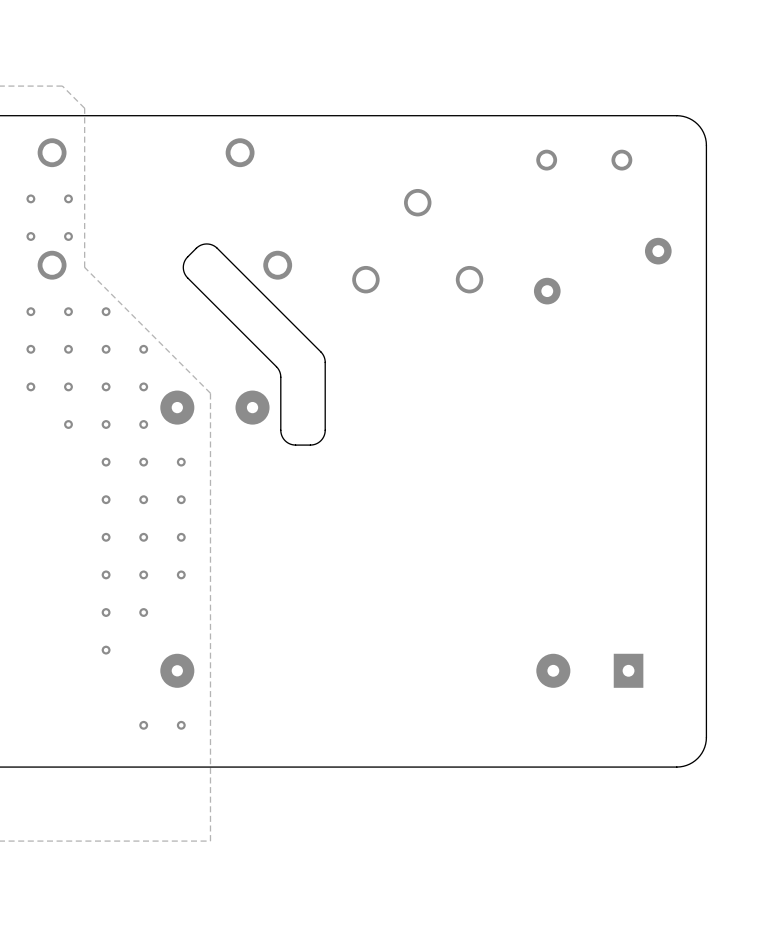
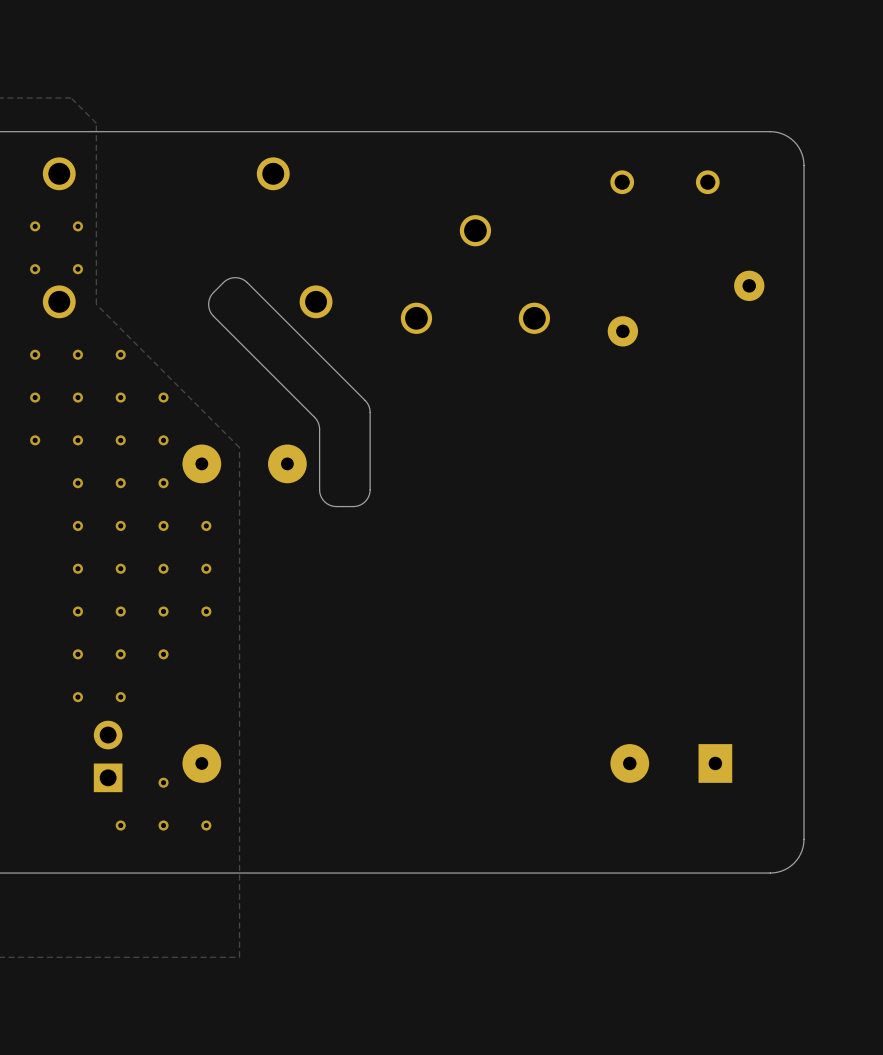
via: none -> (77, 525)
via: none -> (77, 568)
via: none -> (77, 611)
via: none -> (77, 654)
via: (181, 574) -> none
via: none -> (77, 697)
via: (143, 612) -> none
via: (106, 650) -> none
part: none -> (108, 756)
via: none -> (163, 782)
via: none -> (120, 825)

